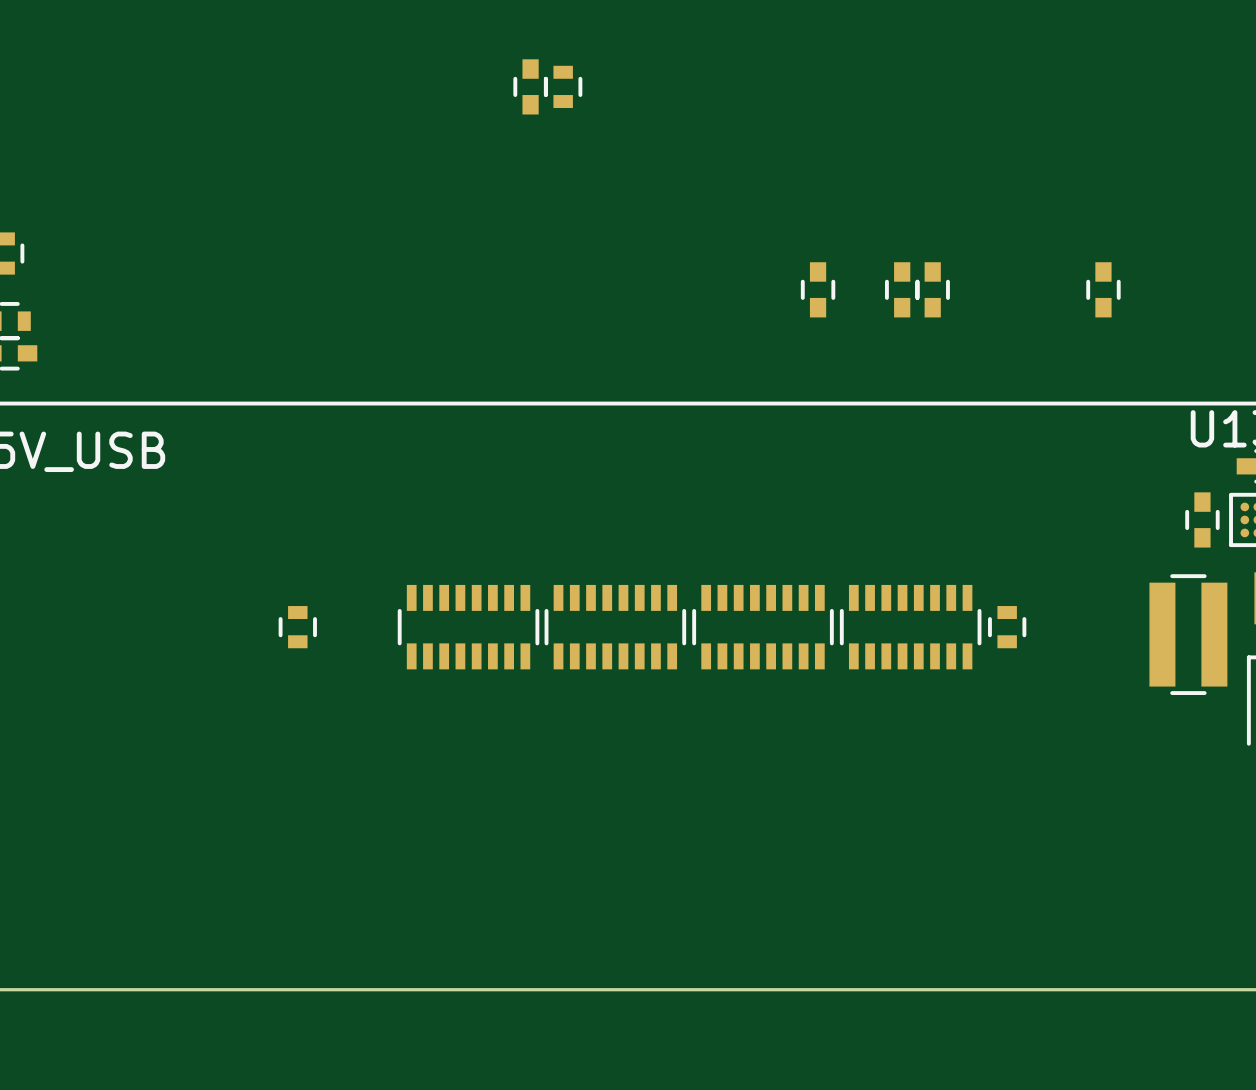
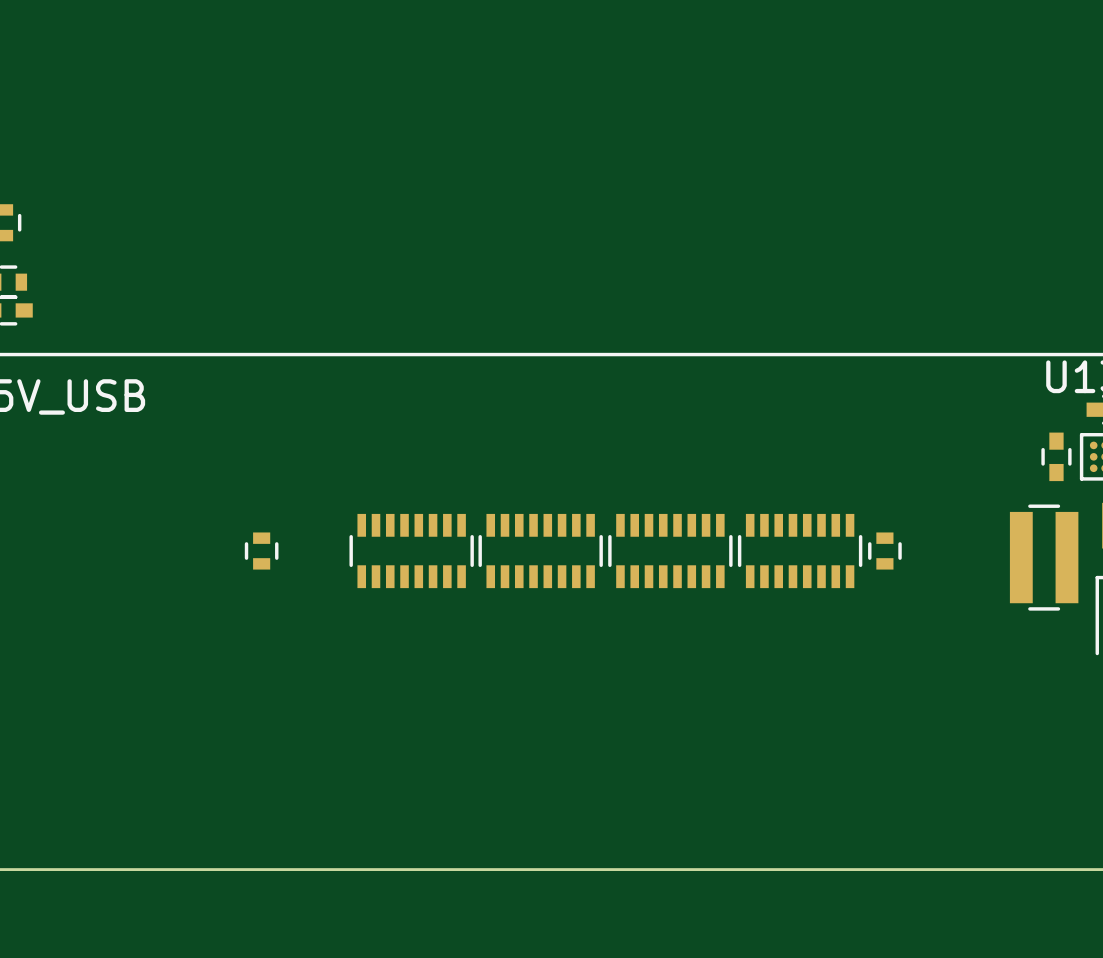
part: (530, 86) -> none
part: (563, 86) -> none
part: (818, 289) -> none
part: (902, 289) -> none
part: (932, 289) -> none
part: (1103, 289) -> none

